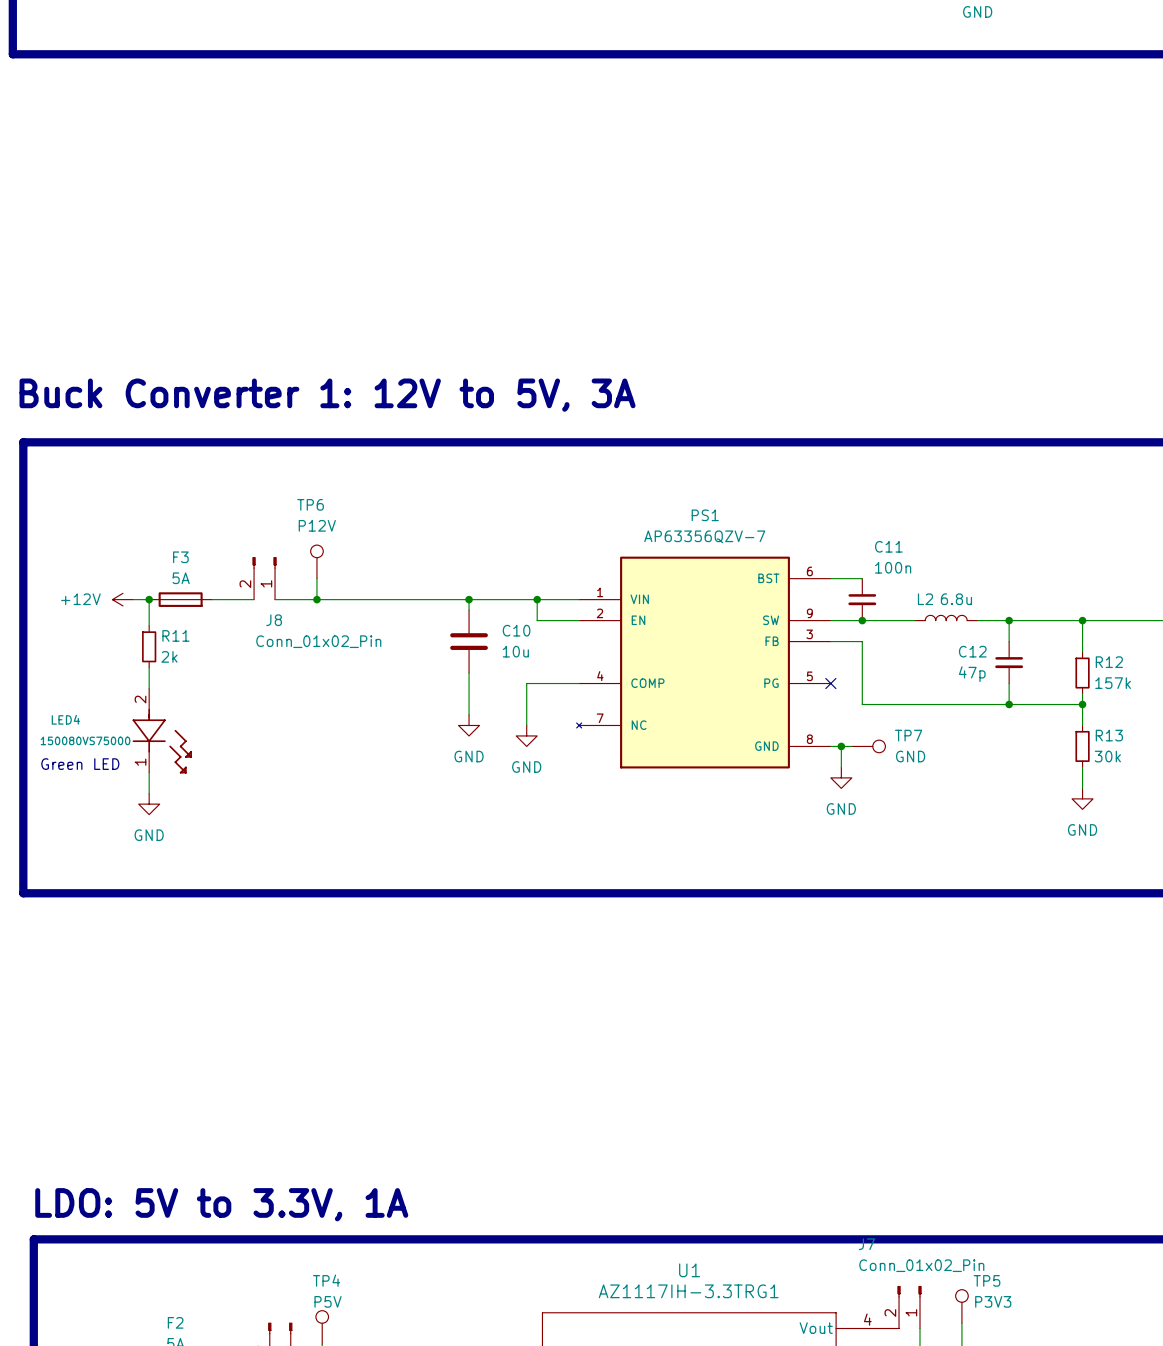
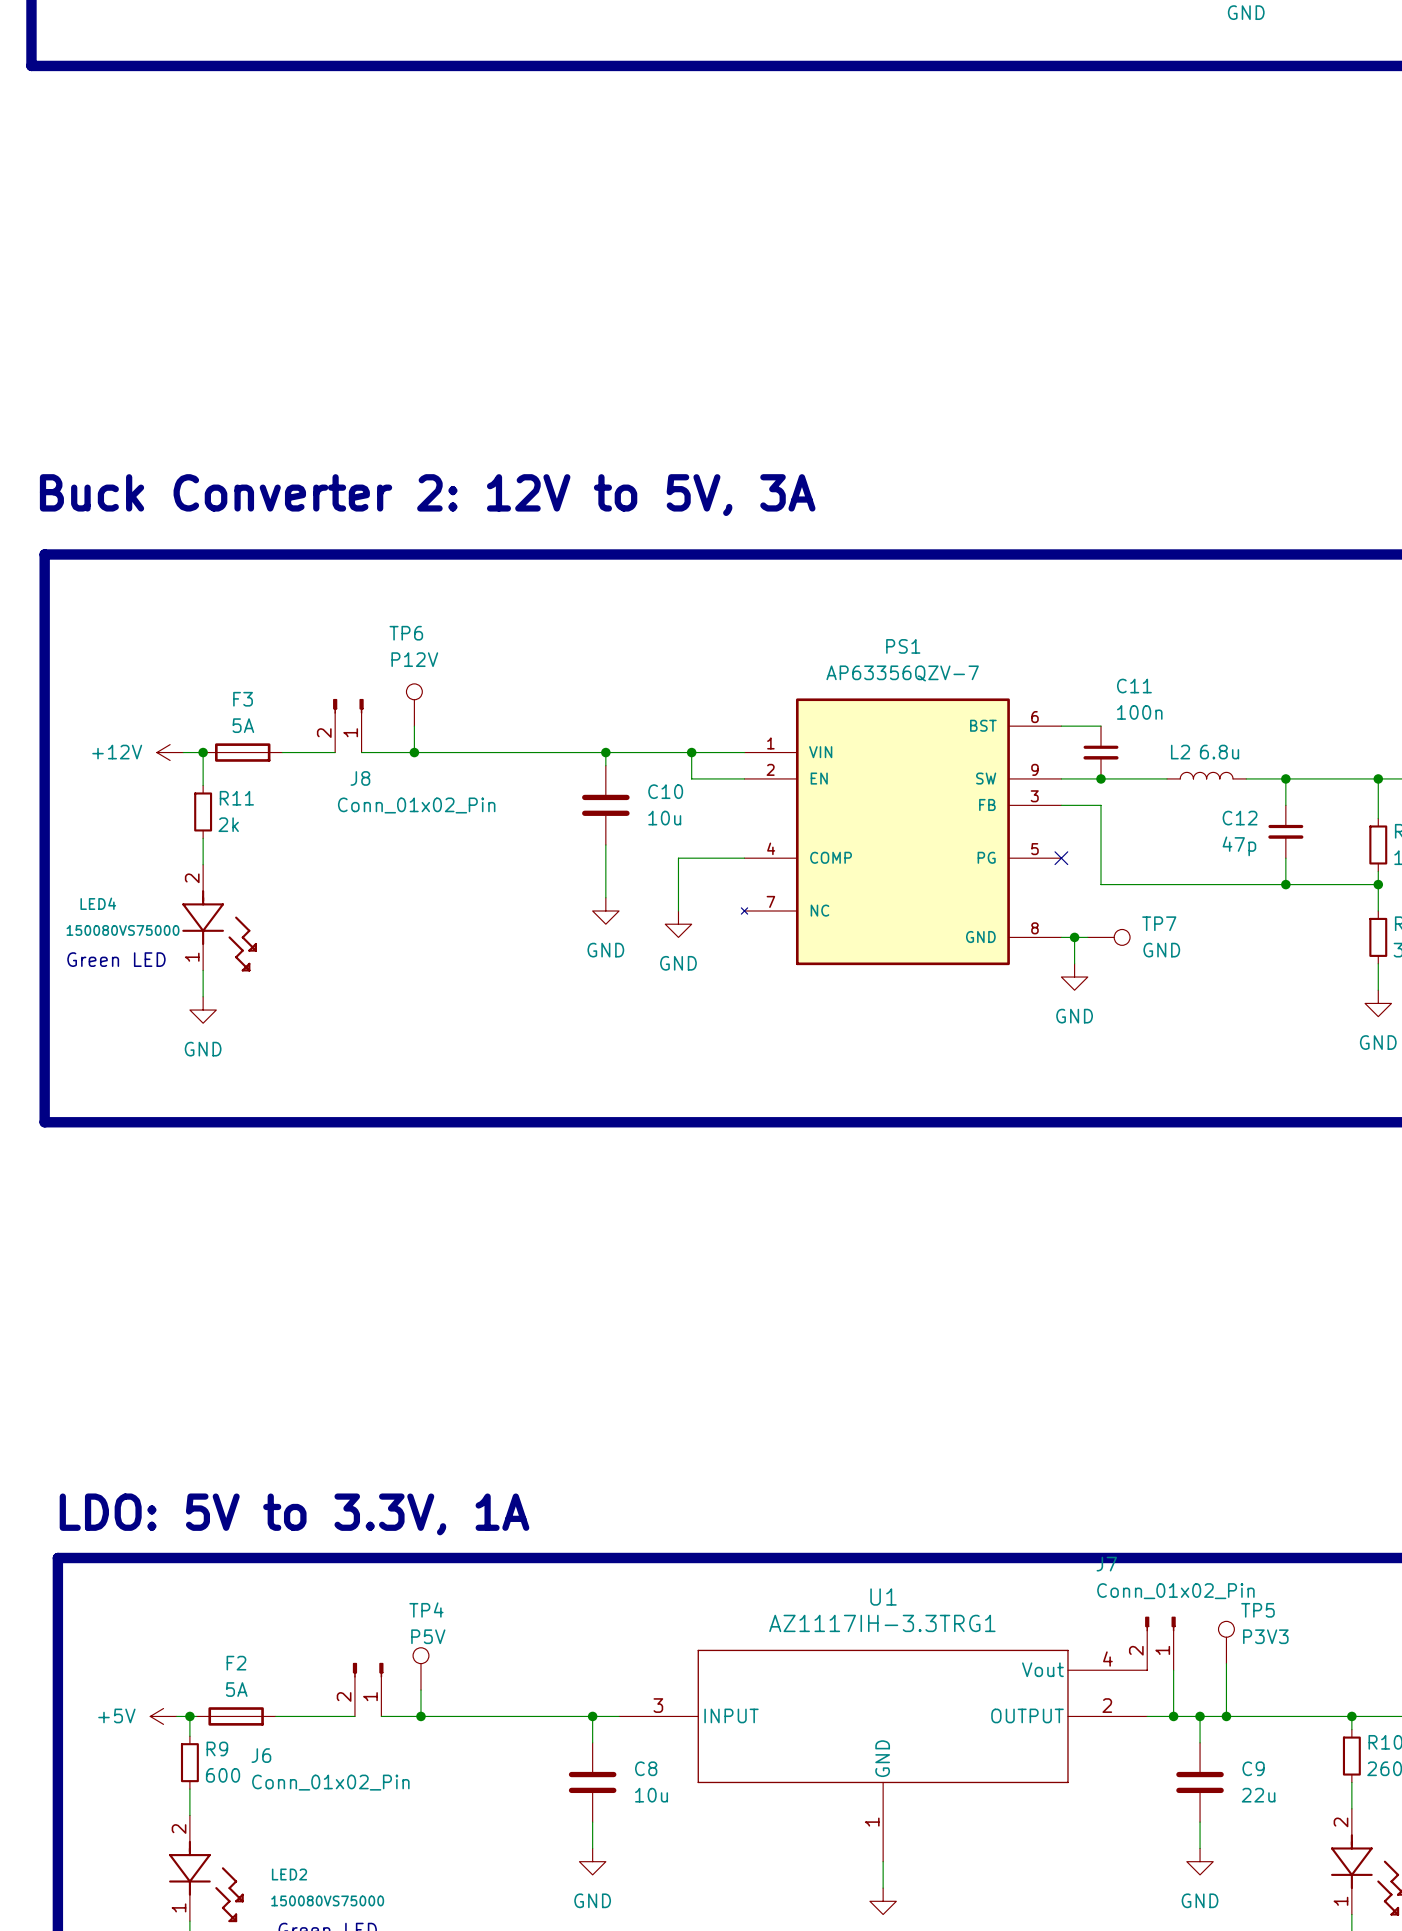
text: Buck Converter 1: 12V to 5V, 3A (327, 395) -> Buck Converter 2: 12V to 5V, 3A (427, 495)

